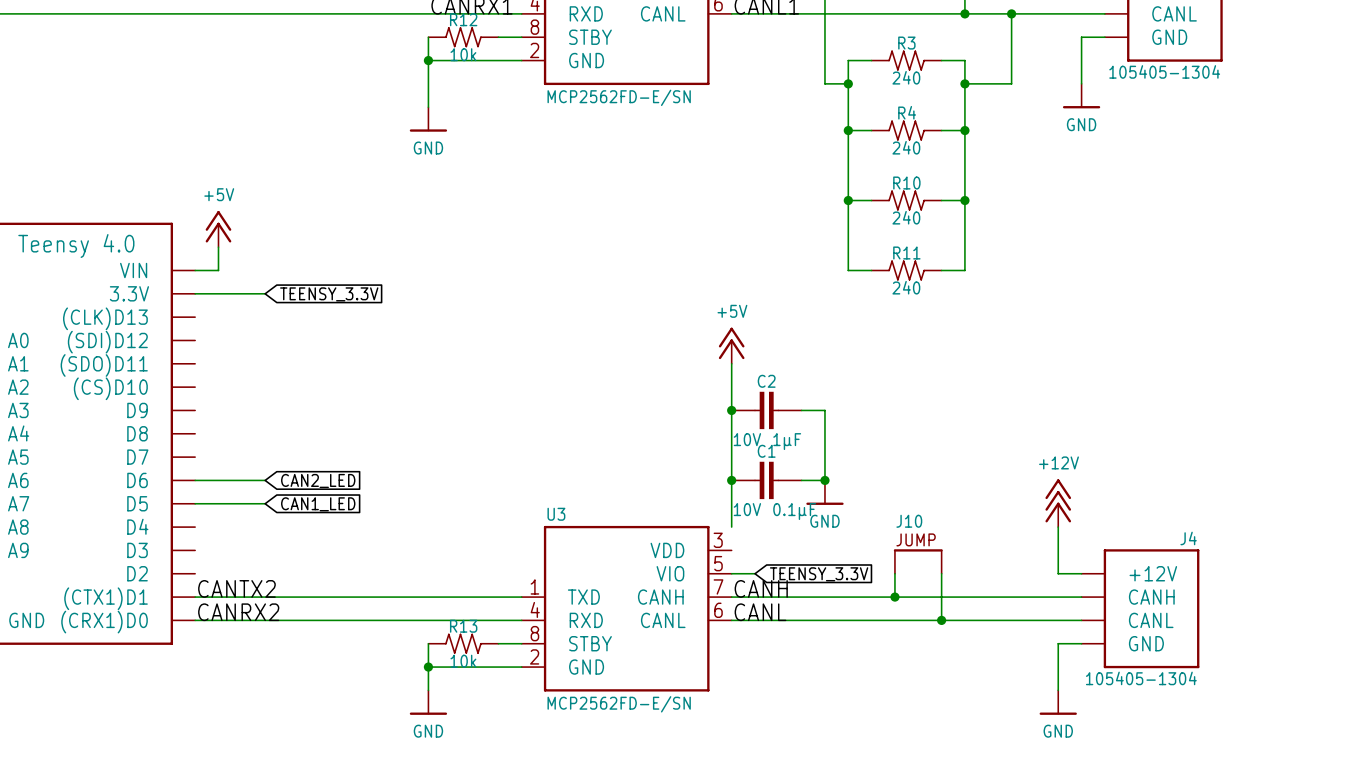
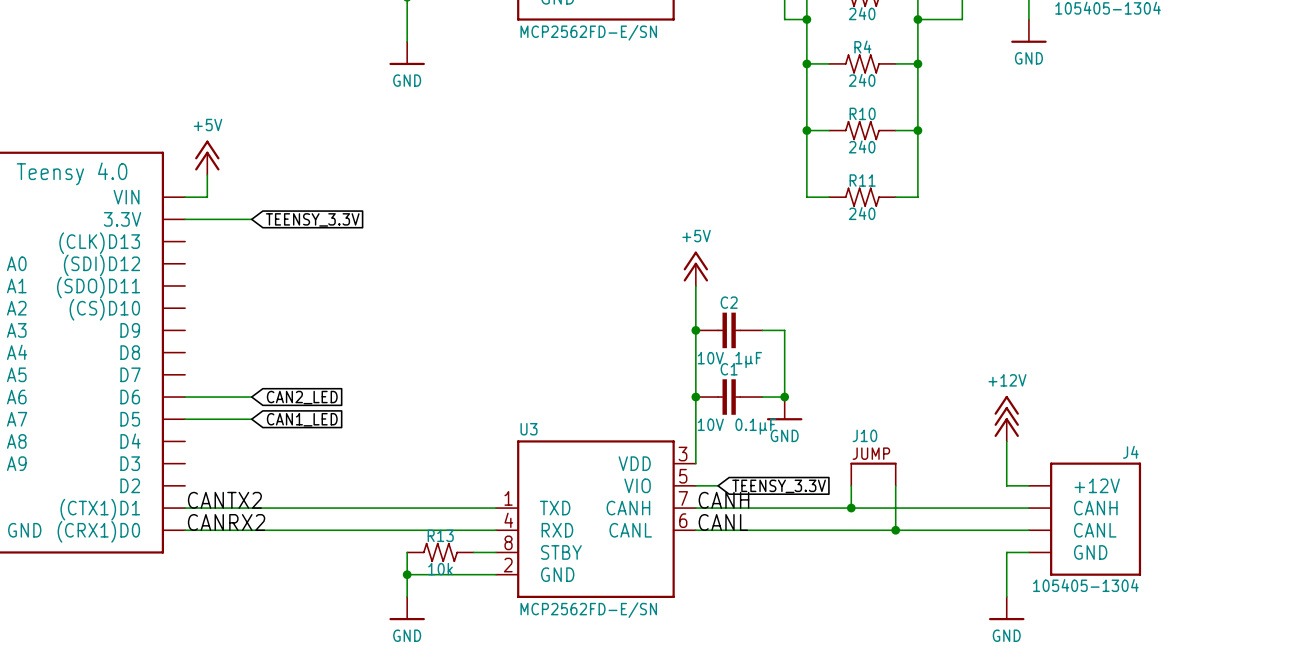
wire: none -> (695, 441) (695, 463)

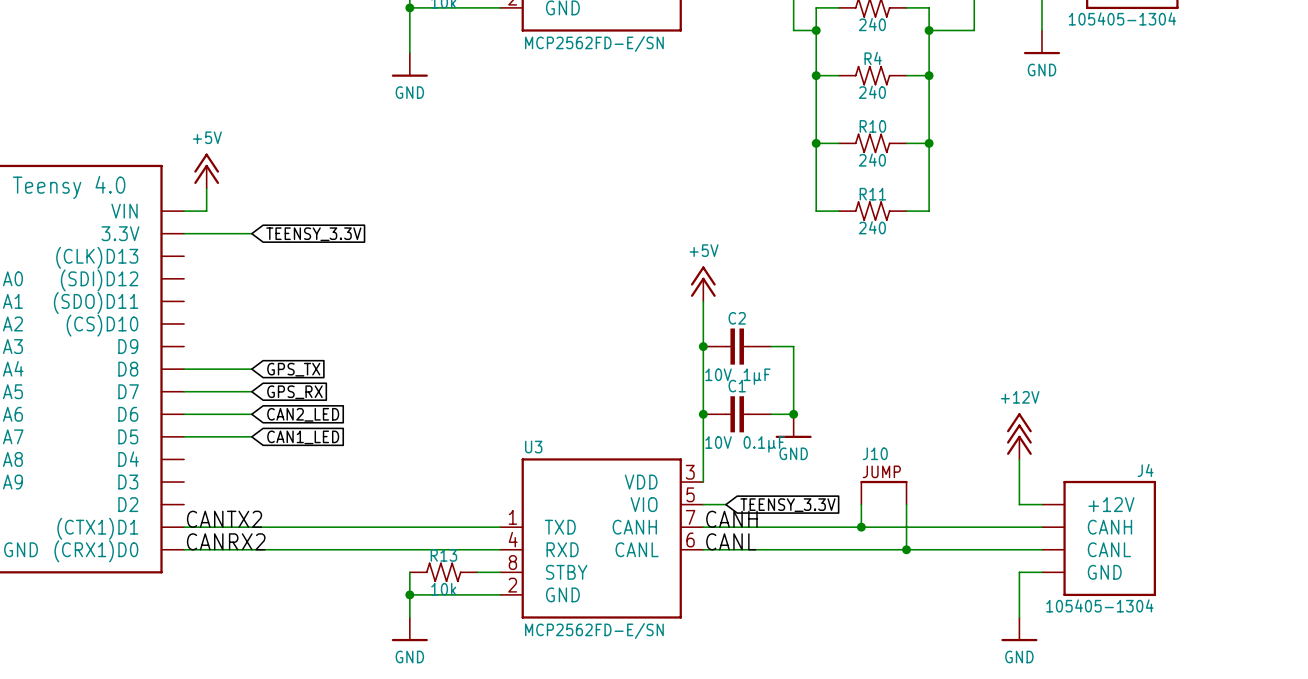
wire: none -> (184, 369) (251, 369)
global label: none -> GPS_TX (293, 369)
wire: none -> (184, 391) (251, 391)
global label: none -> GPS_RX (294, 392)

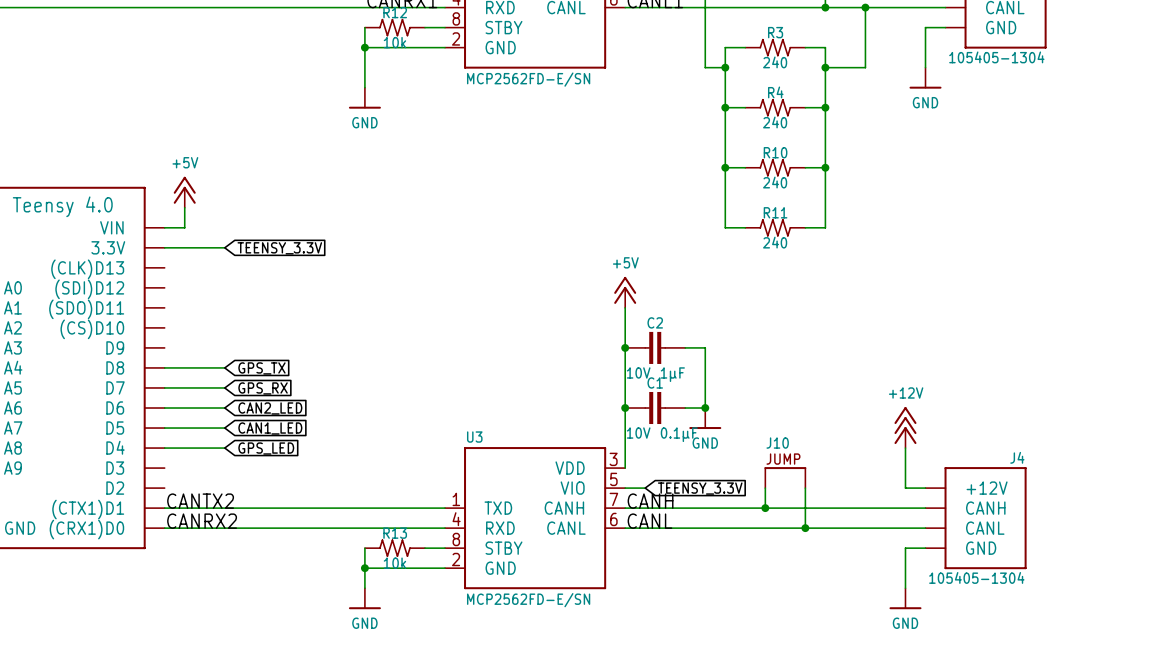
wire: none -> (164, 448) (224, 448)
global label: none -> GPS_LED (266, 448)

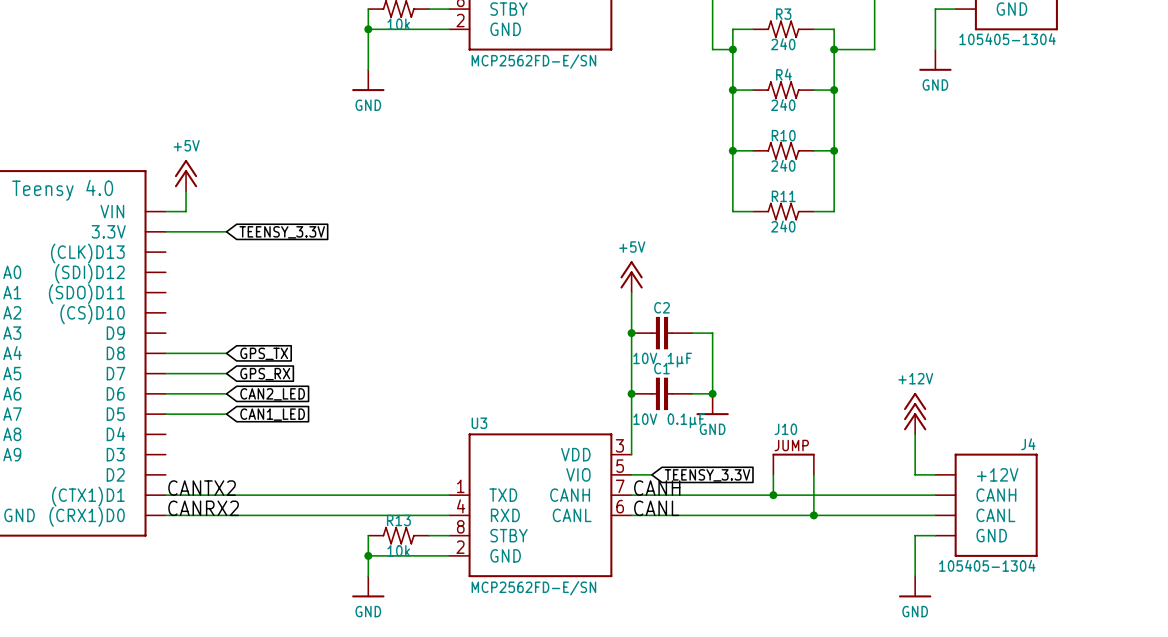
wire: (164, 448) (224, 448) -> none
global label: GPS_LED (266, 448) -> none

